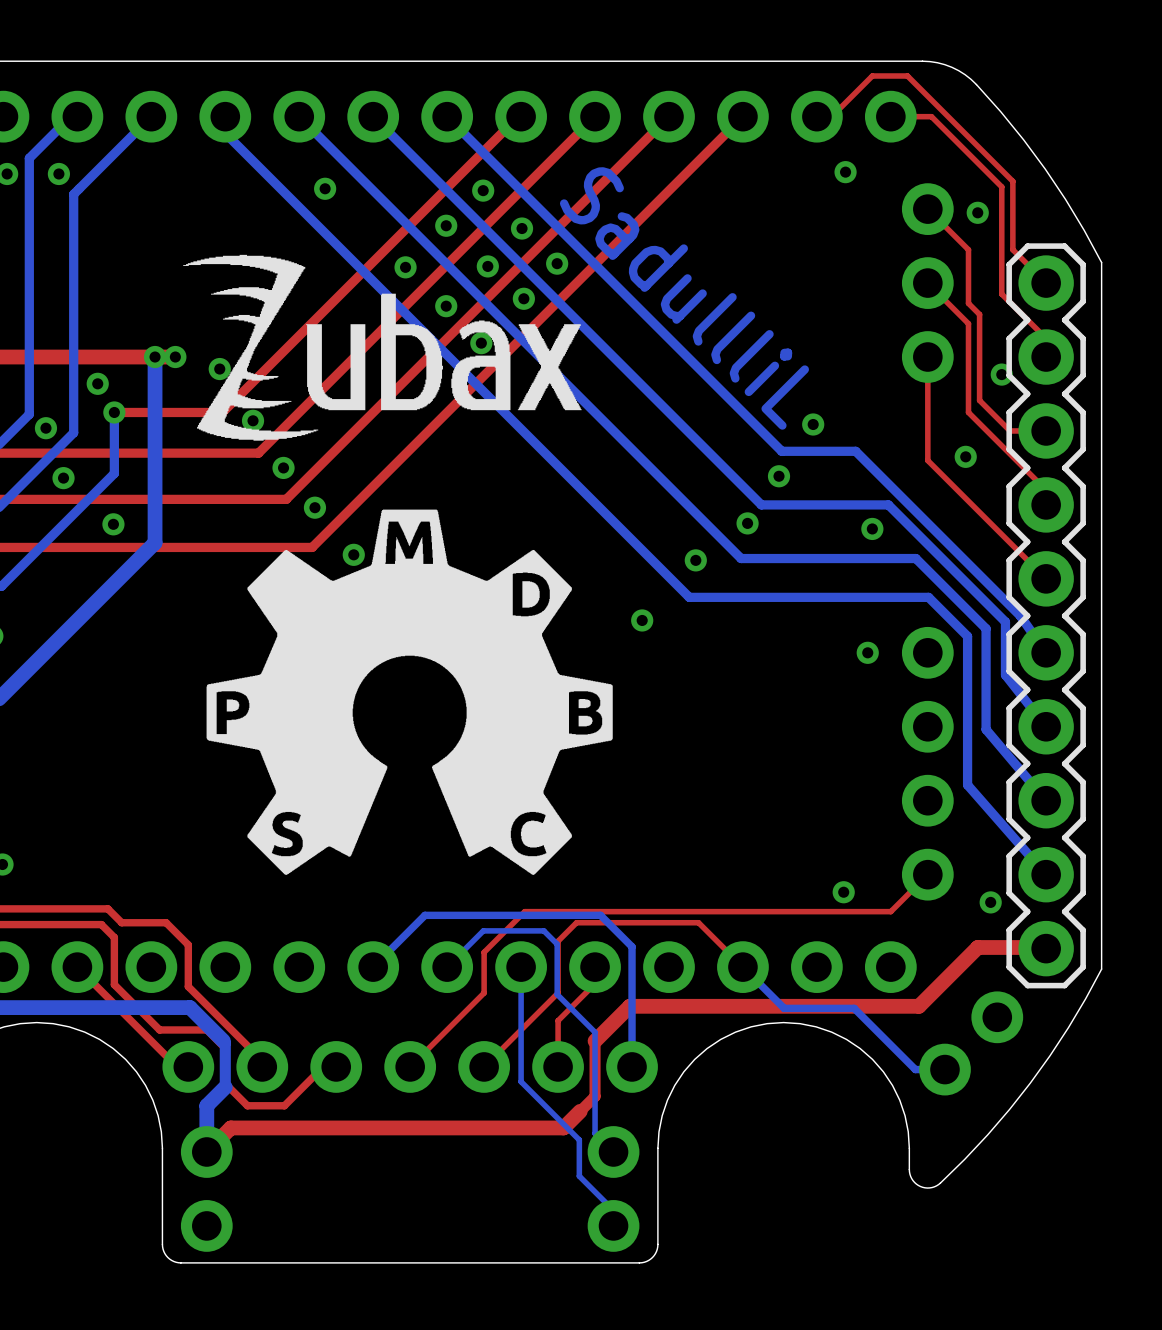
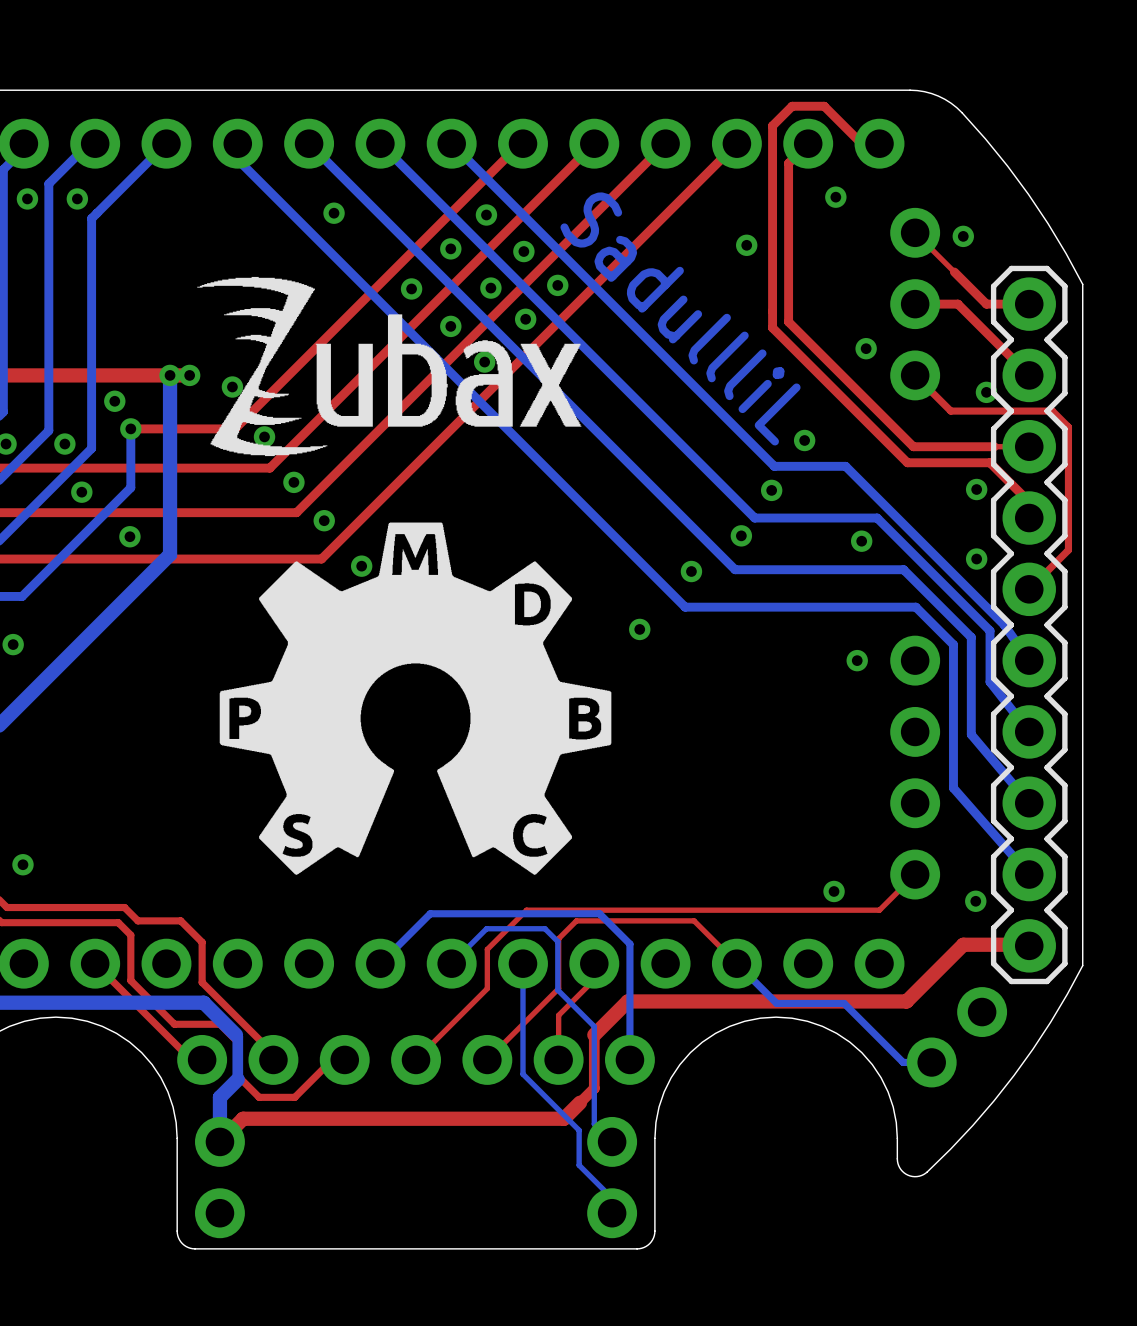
top track: (816, 116) (831, 116) (872, 76) (907, 76) (1012, 181) (1012, 249) (1046, 283) -> (808, 143) (788, 163) (788, 321) (913, 446) (994, 446)
top track: (890, 116) (931, 116) (1001, 186) (1001, 294) (1046, 338) (1046, 357) -> (879, 143) (861, 143) (824, 106) (792, 106) (772, 125) (772, 327) (907, 462) (990, 462) (1029, 503)
via: none -> (746, 245)
top track: (968, 249) (968, 303) (979, 314) (979, 400) (1010, 430) -> (954, 272) (986, 304) (1029, 304)
top track: (927, 283) (968, 323) (968, 412) (1046, 490) -> (915, 304) (957, 304) (1029, 375)
via: none -> (866, 348)
top track: (927, 357) (927, 460) (1046, 578) -> (915, 375) (950, 411) (1052, 411) (1068, 427) (1068, 550) (1029, 589)
via position: (965, 456) -> (976, 489)
via: none -> (976, 559)

